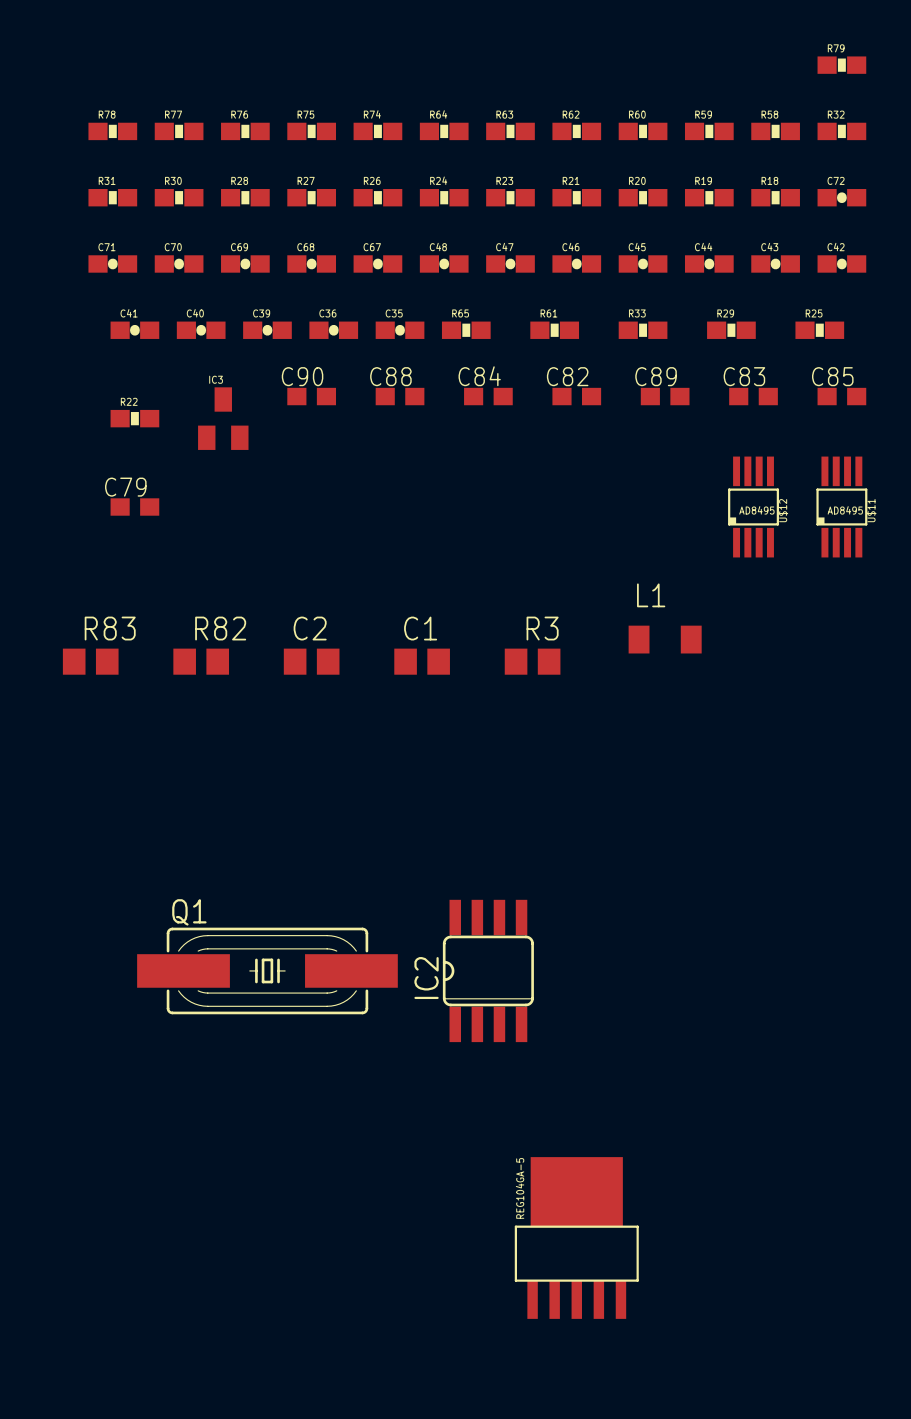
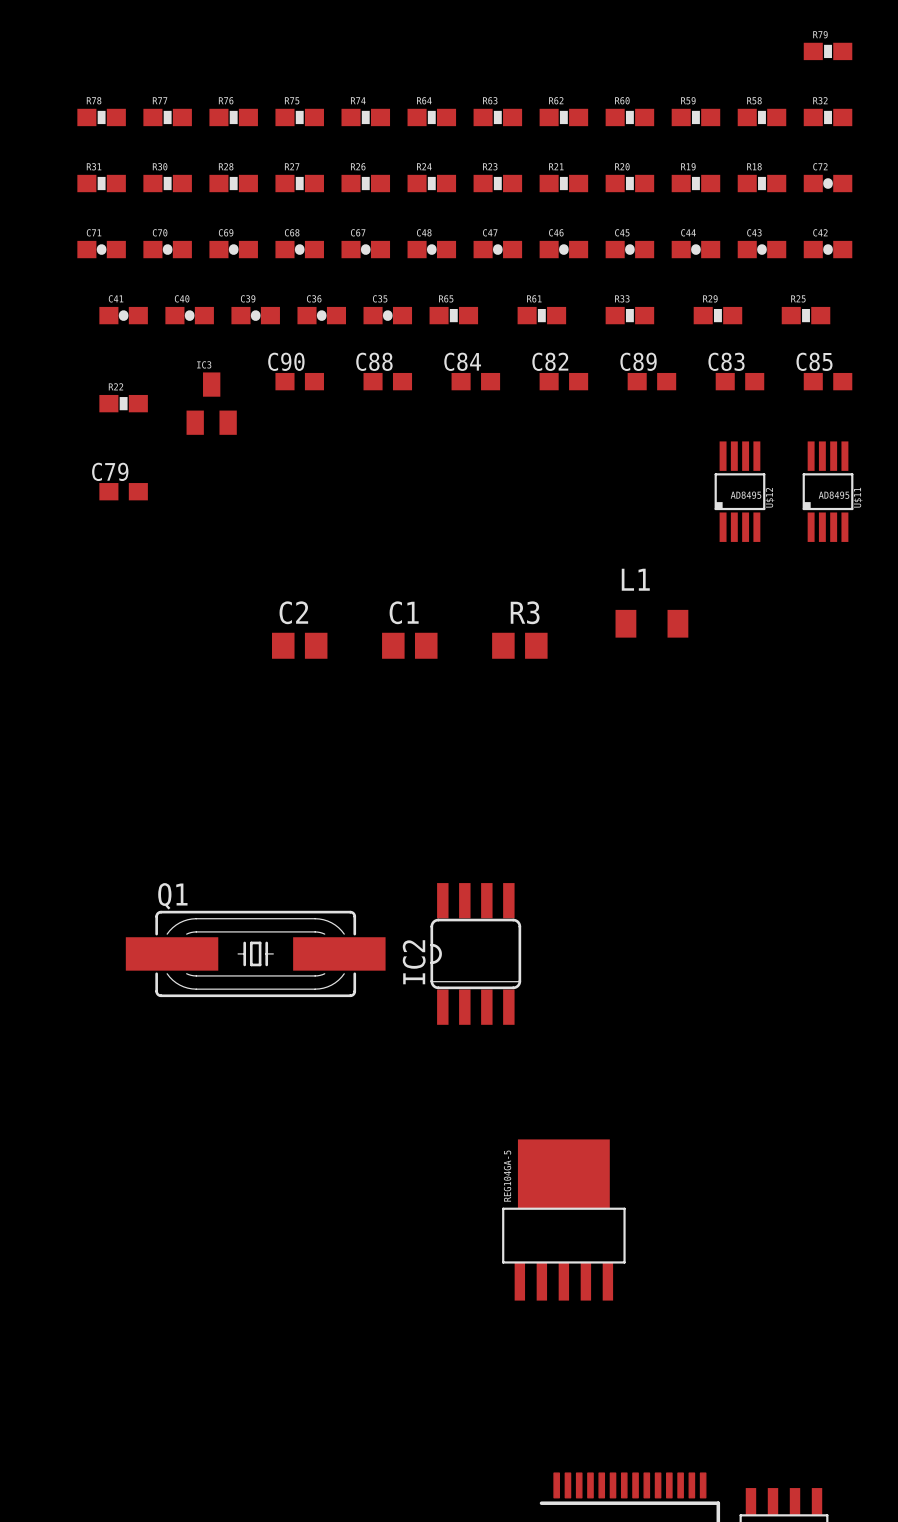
R83: (90, 661) -> none
R82: (201, 661) -> none

